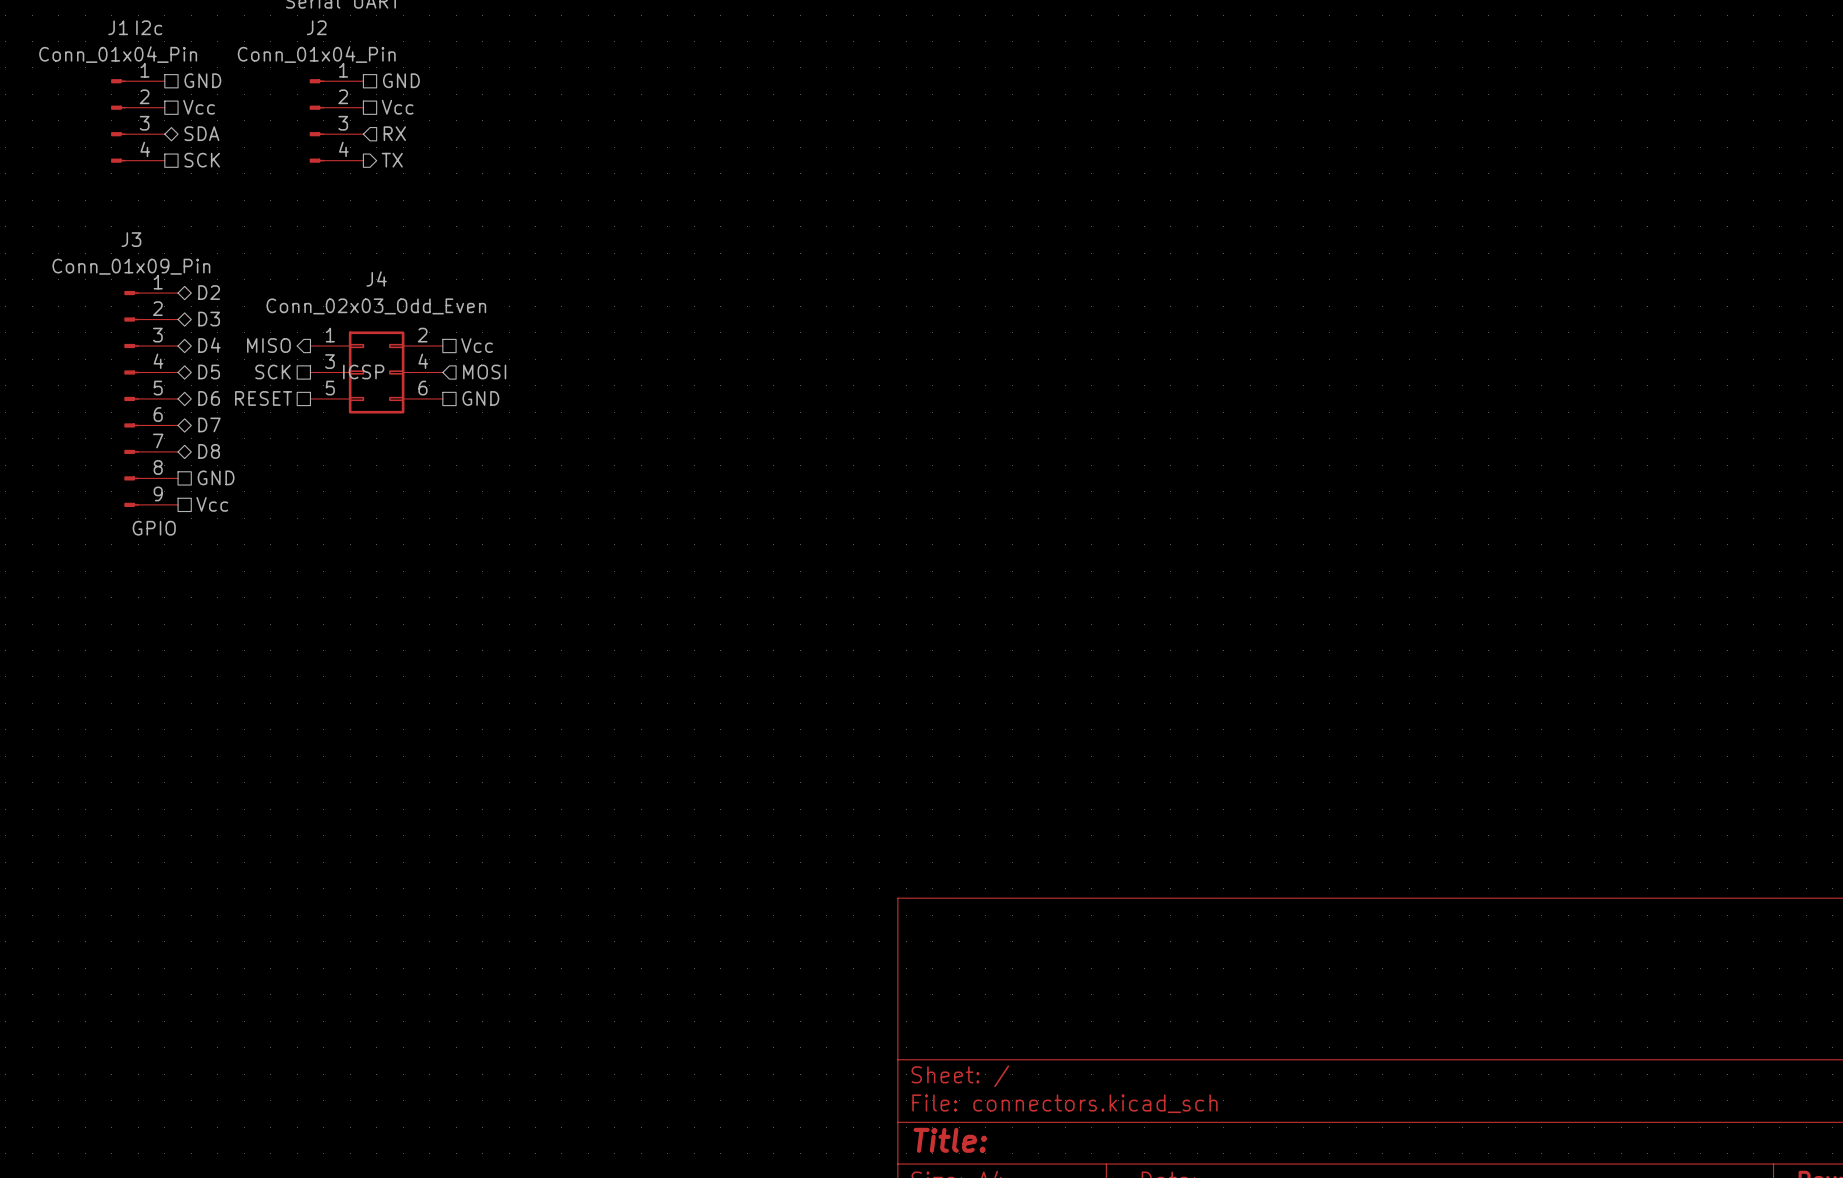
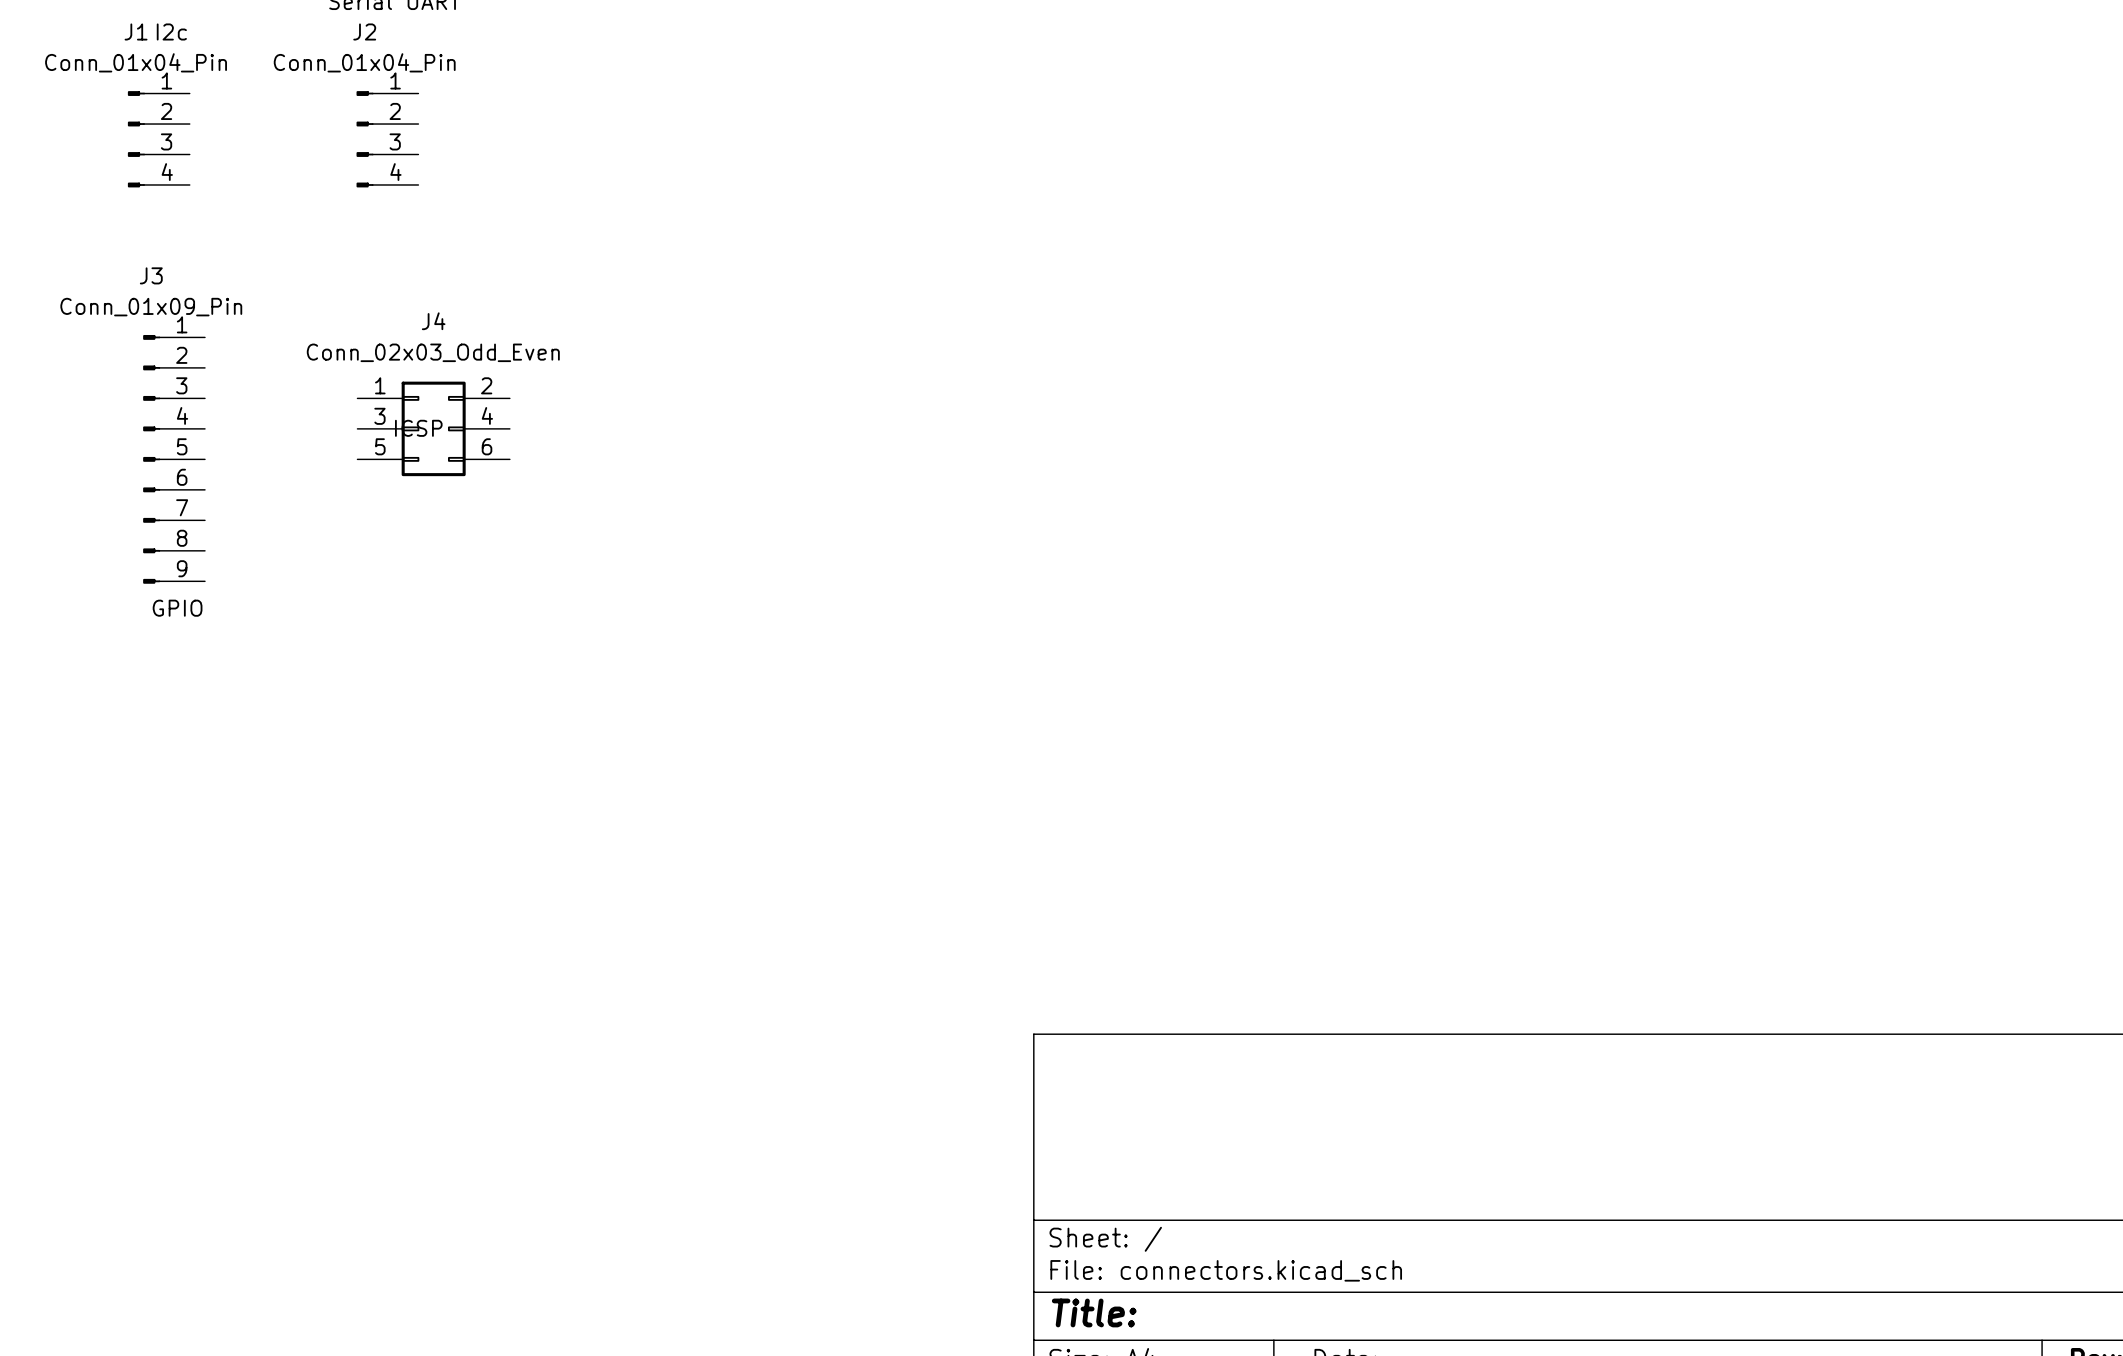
hierarchical label: GND (202, 80) -> none
hierarchical label: GND (401, 80) -> none
hierarchical label: Vcc (199, 107) -> none
hierarchical label: Vcc (397, 107) -> none
hierarchical label: SDA (201, 133) -> none
hierarchical label: RX (394, 133) -> none
hierarchical label: SCK (202, 160) -> none
hierarchical label: TX (392, 160) -> none
hierarchical label: D2 (209, 292) -> none
hierarchical label: D3 (209, 319) -> none
hierarchical label: D4 (209, 345) -> none
hierarchical label: MISO (268, 345) -> none
hierarchical label: Vcc (477, 345) -> none
hierarchical label: D5 (209, 371) -> none
hierarchical label: SCK (273, 371) -> none
hierarchical label: MOSI (484, 371) -> none
hierarchical label: D6 (209, 398) -> none
hierarchical label: RESET (263, 398) -> none
hierarchical label: GND (480, 398) -> none
hierarchical label: D7 (209, 424) -> none
hierarchical label: D8 (209, 451) -> none
hierarchical label: GND (216, 477) -> none
hierarchical label: Vcc (212, 504) -> none

